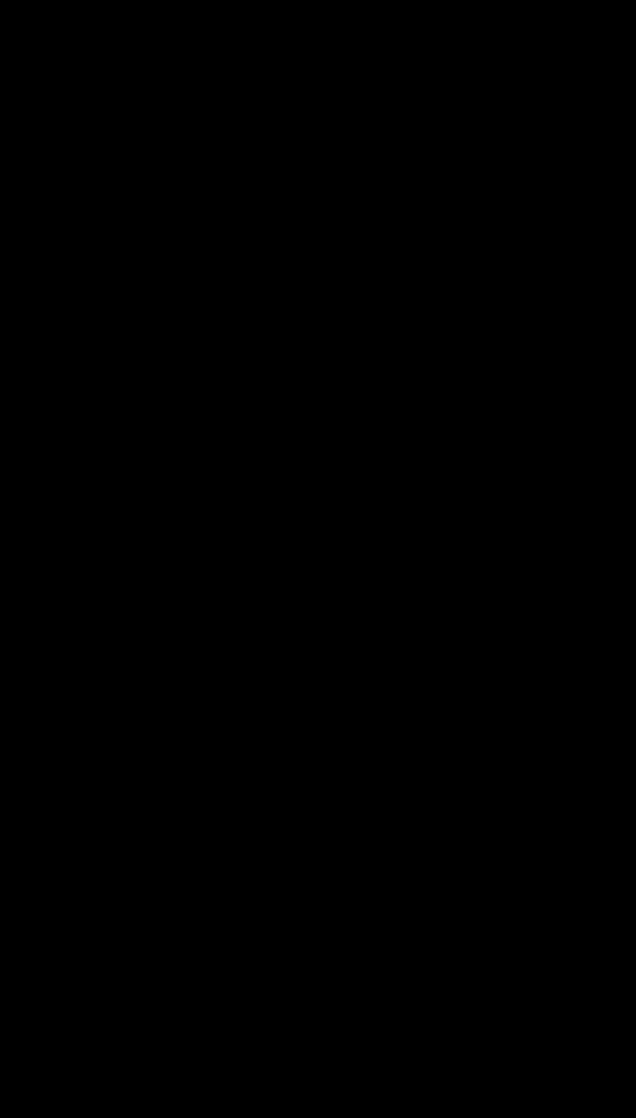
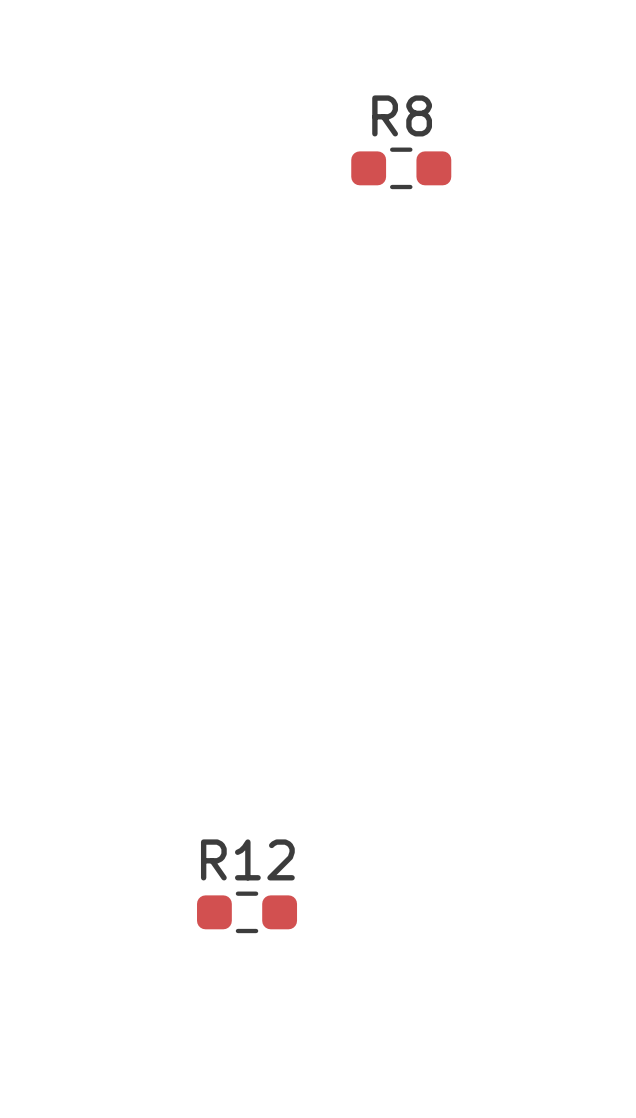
R8: none -> (401, 168)
R12: none -> (247, 912)

